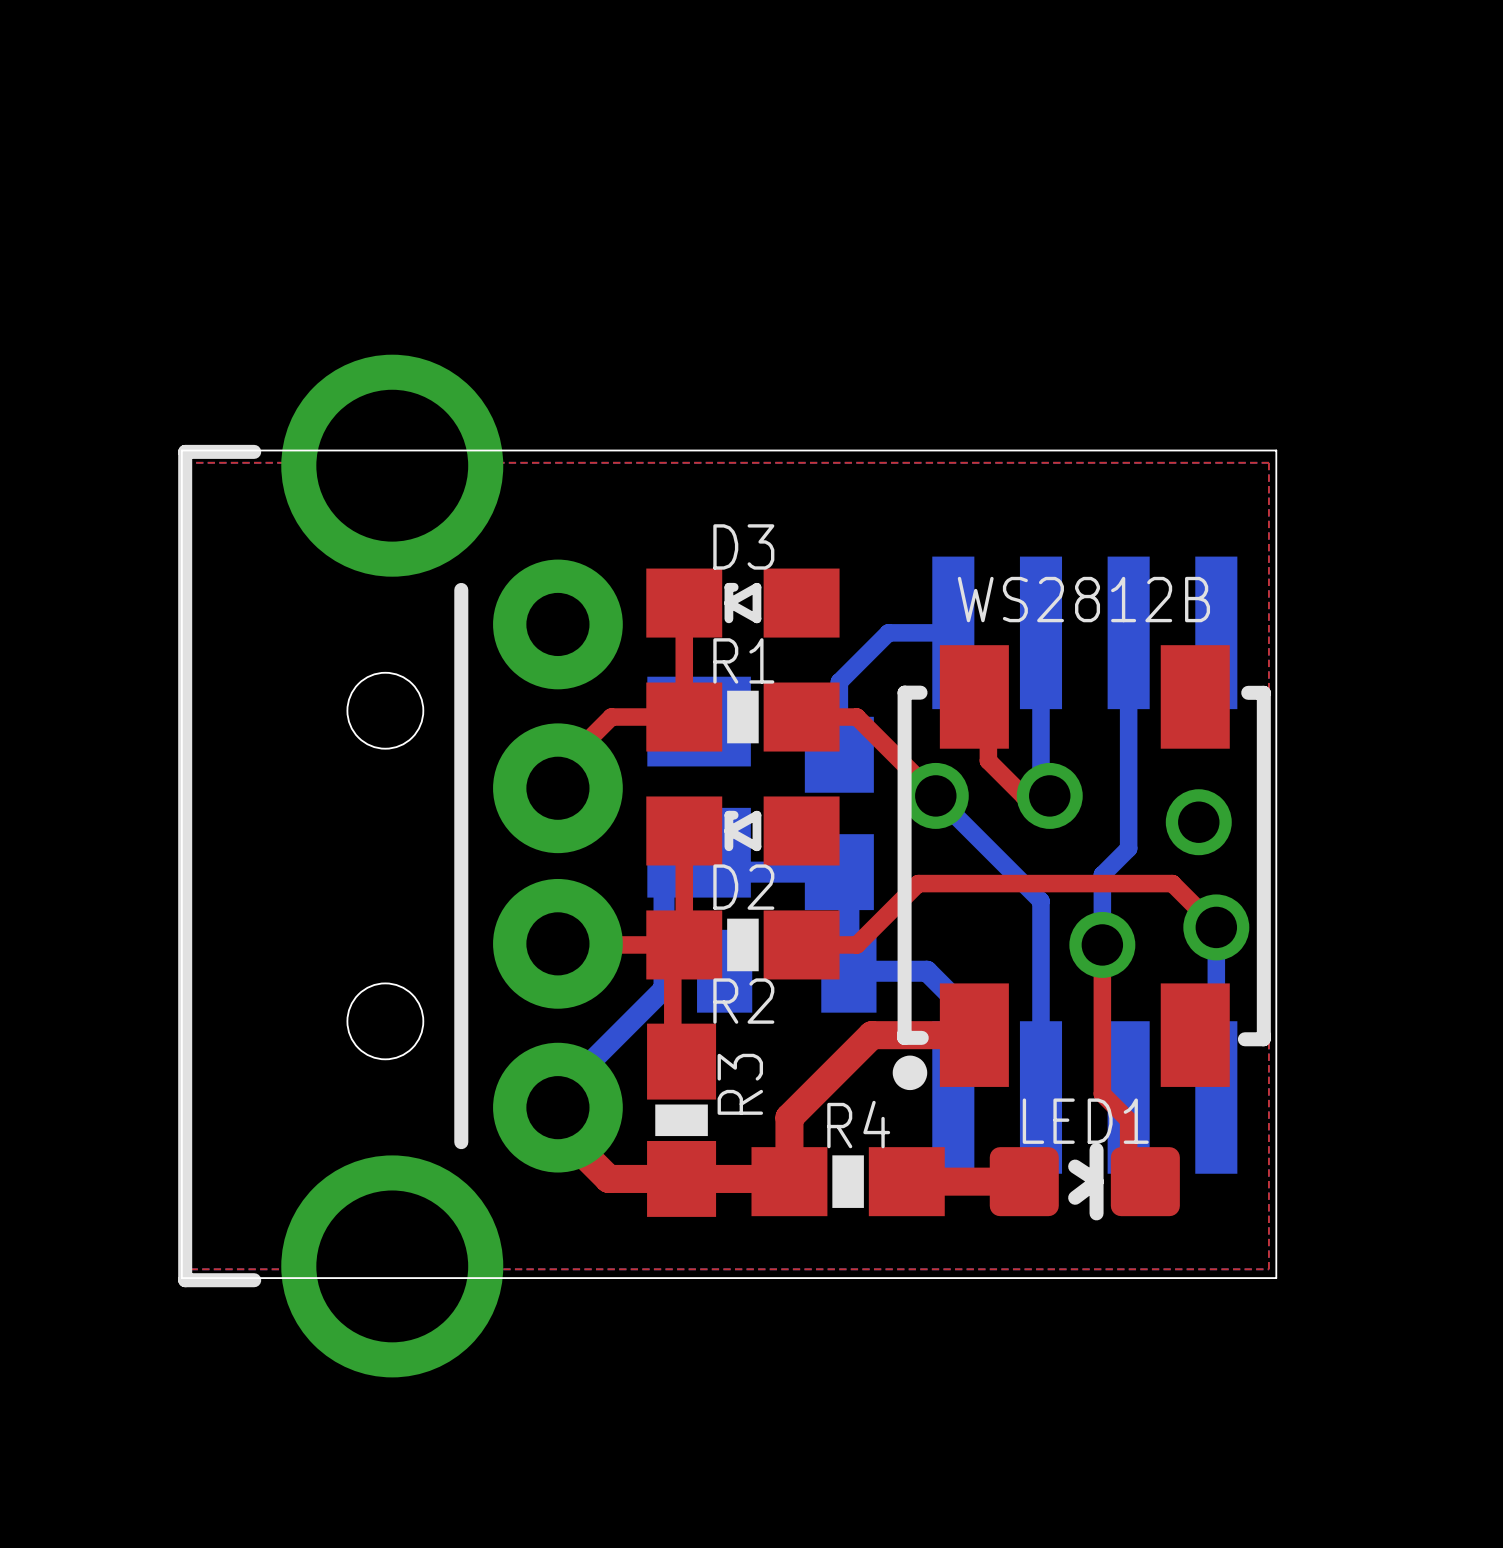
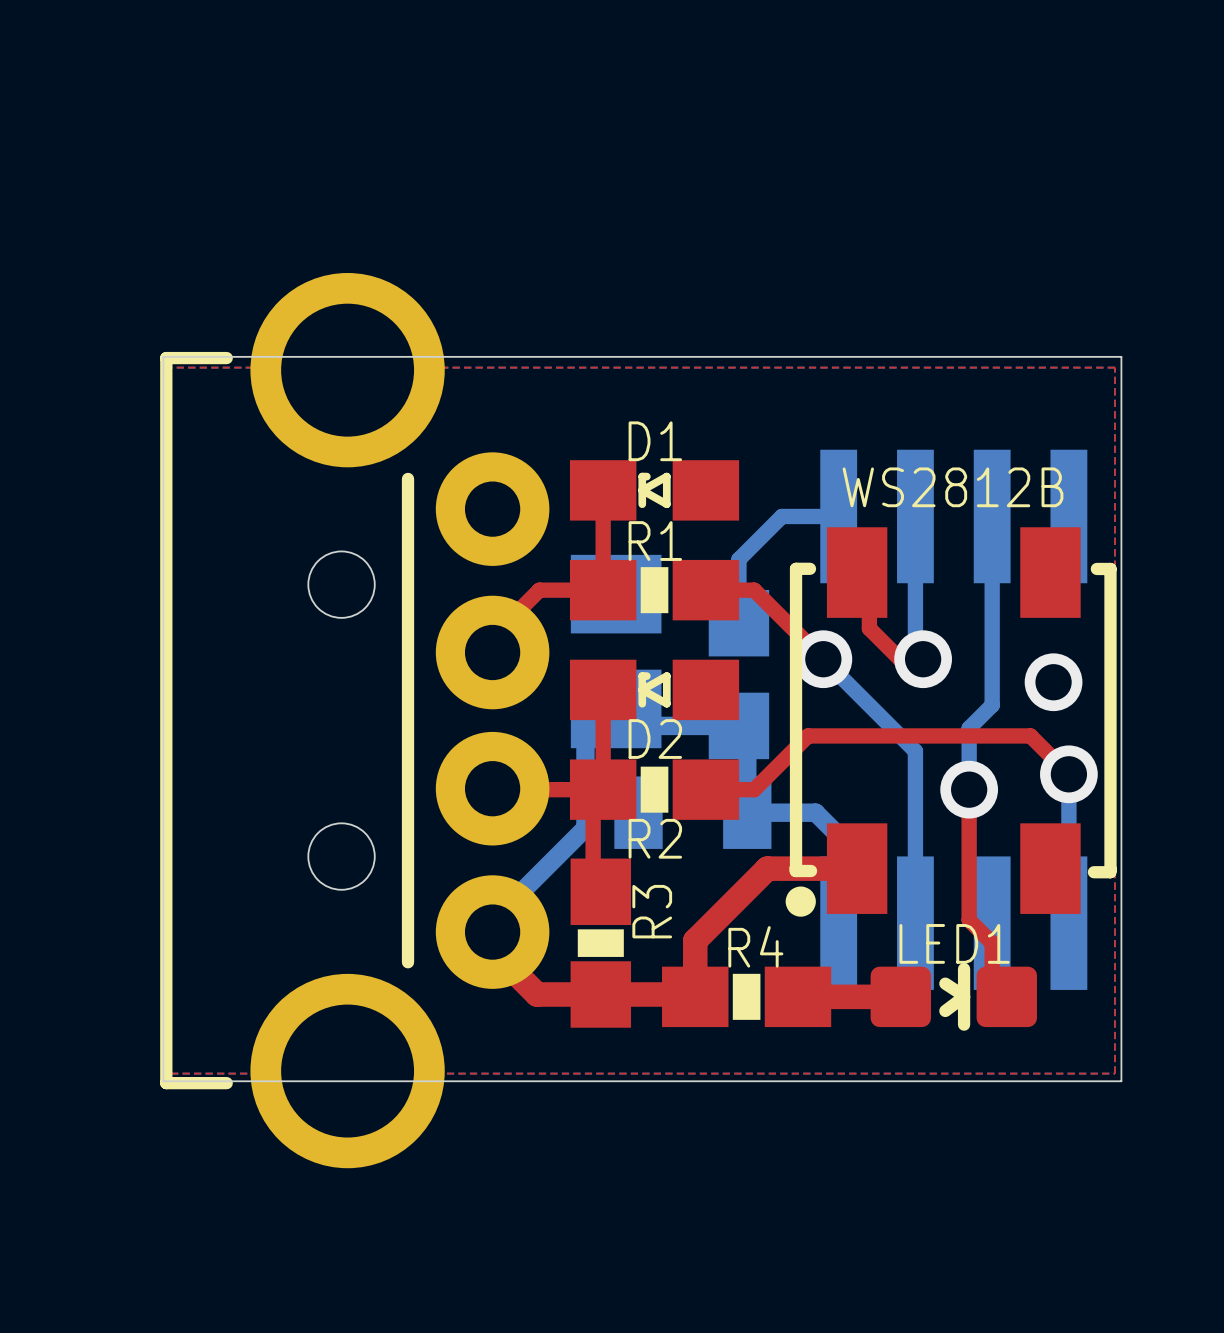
D3 name: D3 (743, 546) -> D1 (655, 441)

